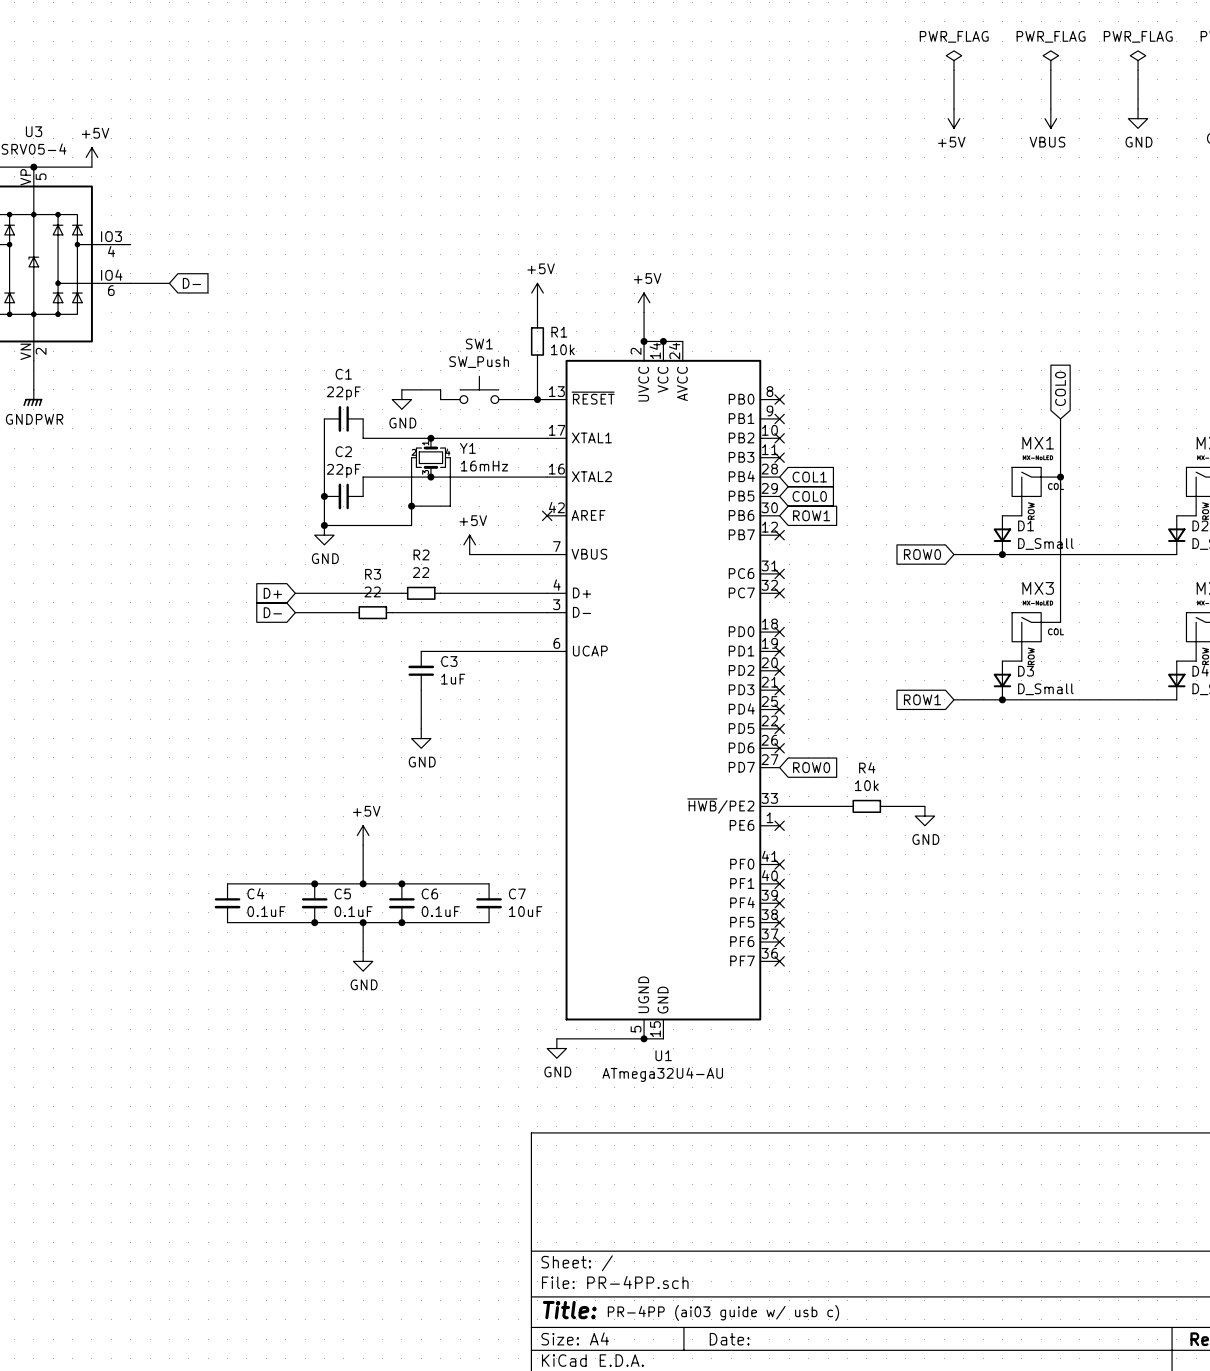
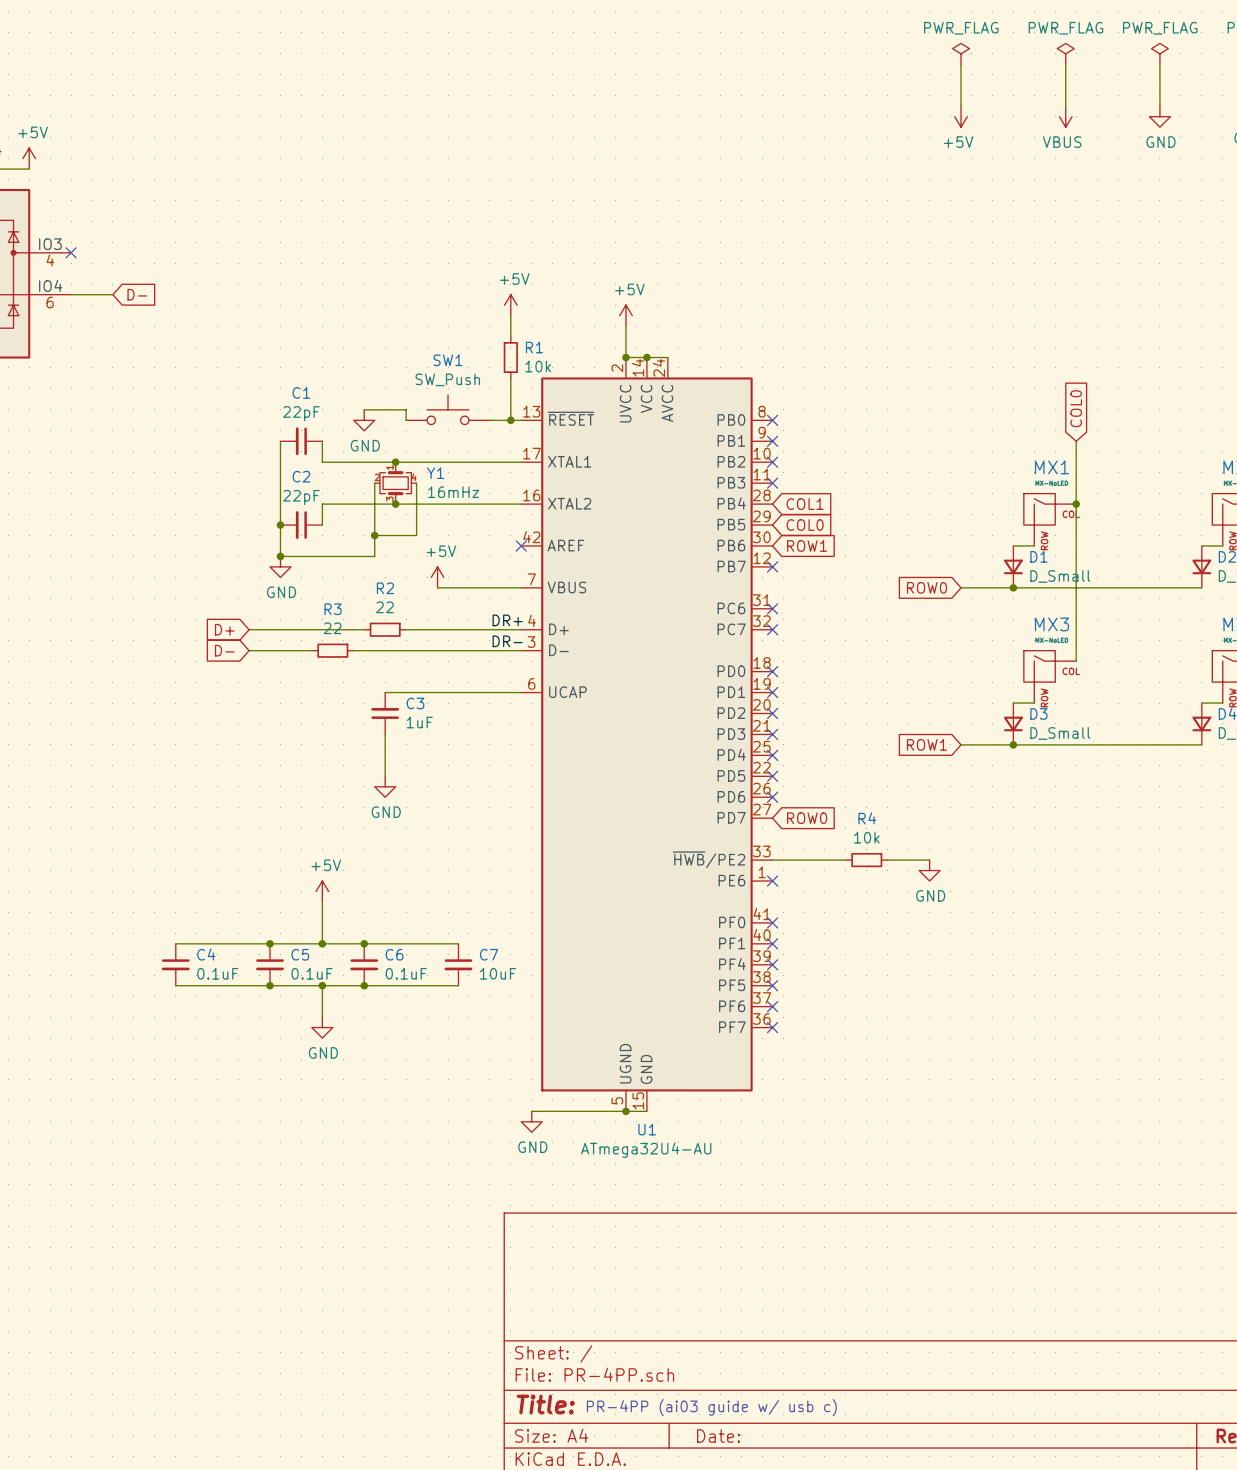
no-connect mark: none -> (71, 252)
label: none -> DR+ (507, 620)
label: none -> DR- (507, 641)

